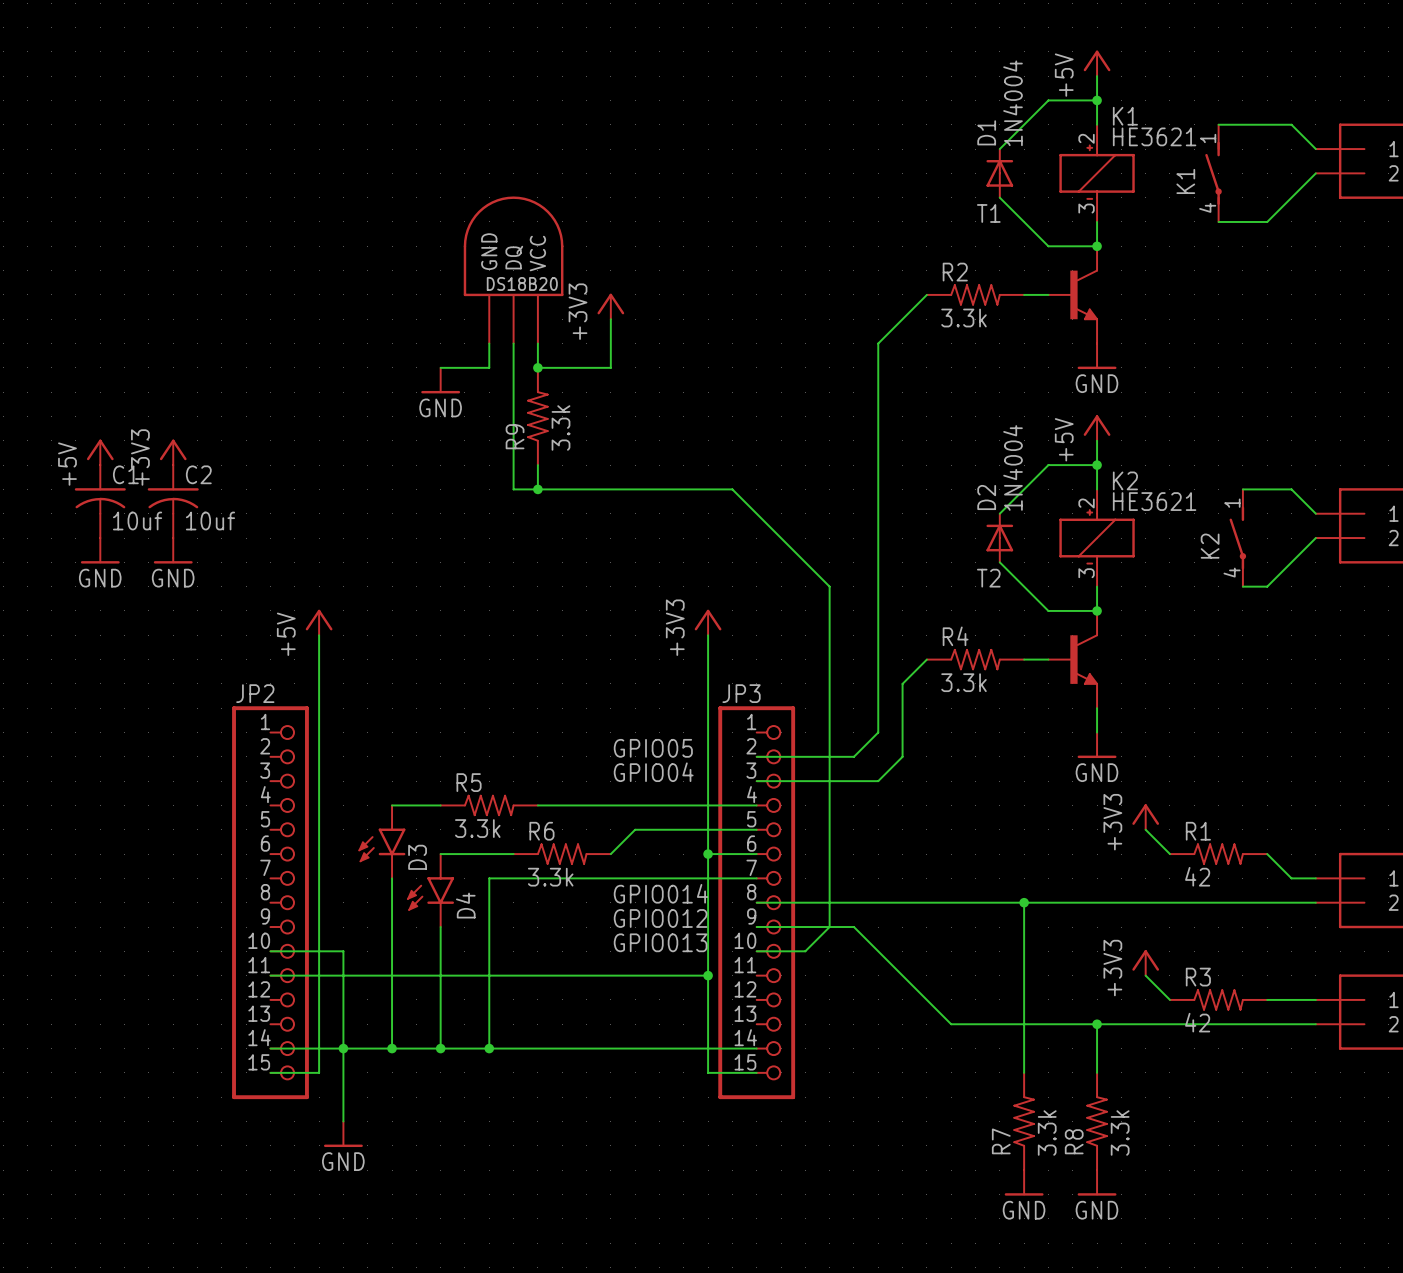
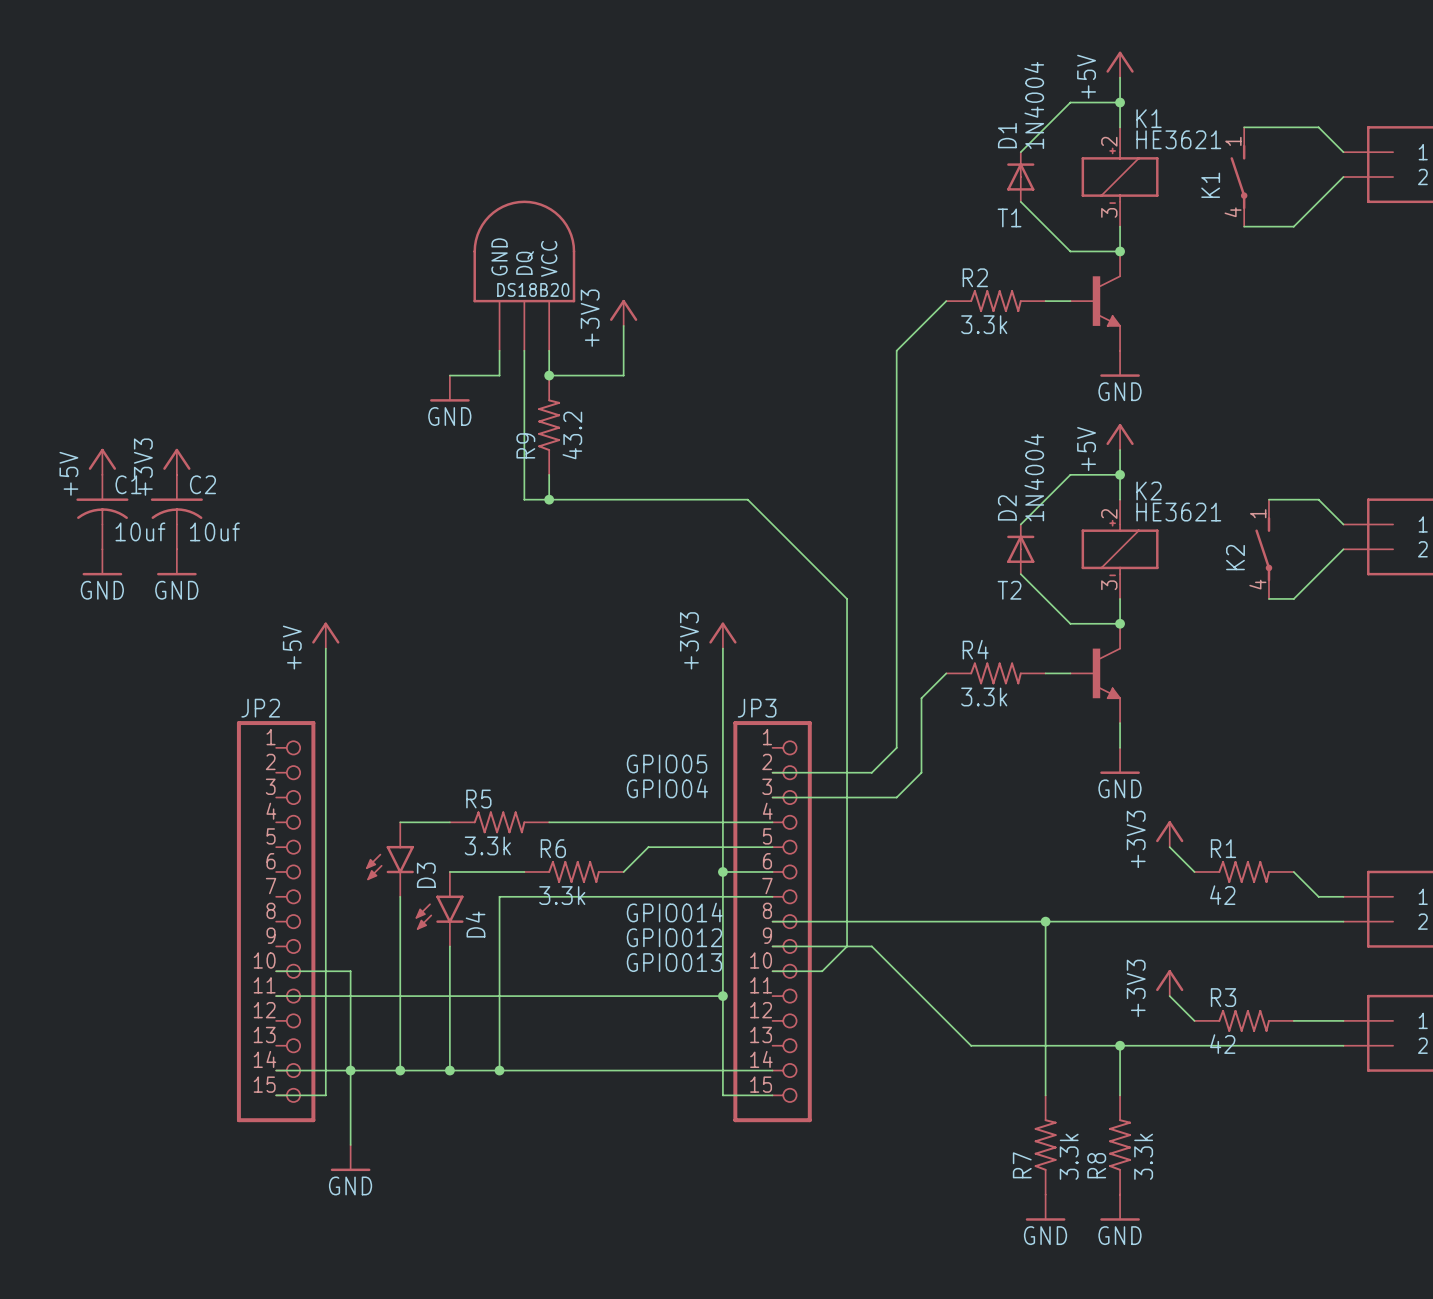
R9 value: 3.3k (561, 427) -> 43.2 (572, 435)

